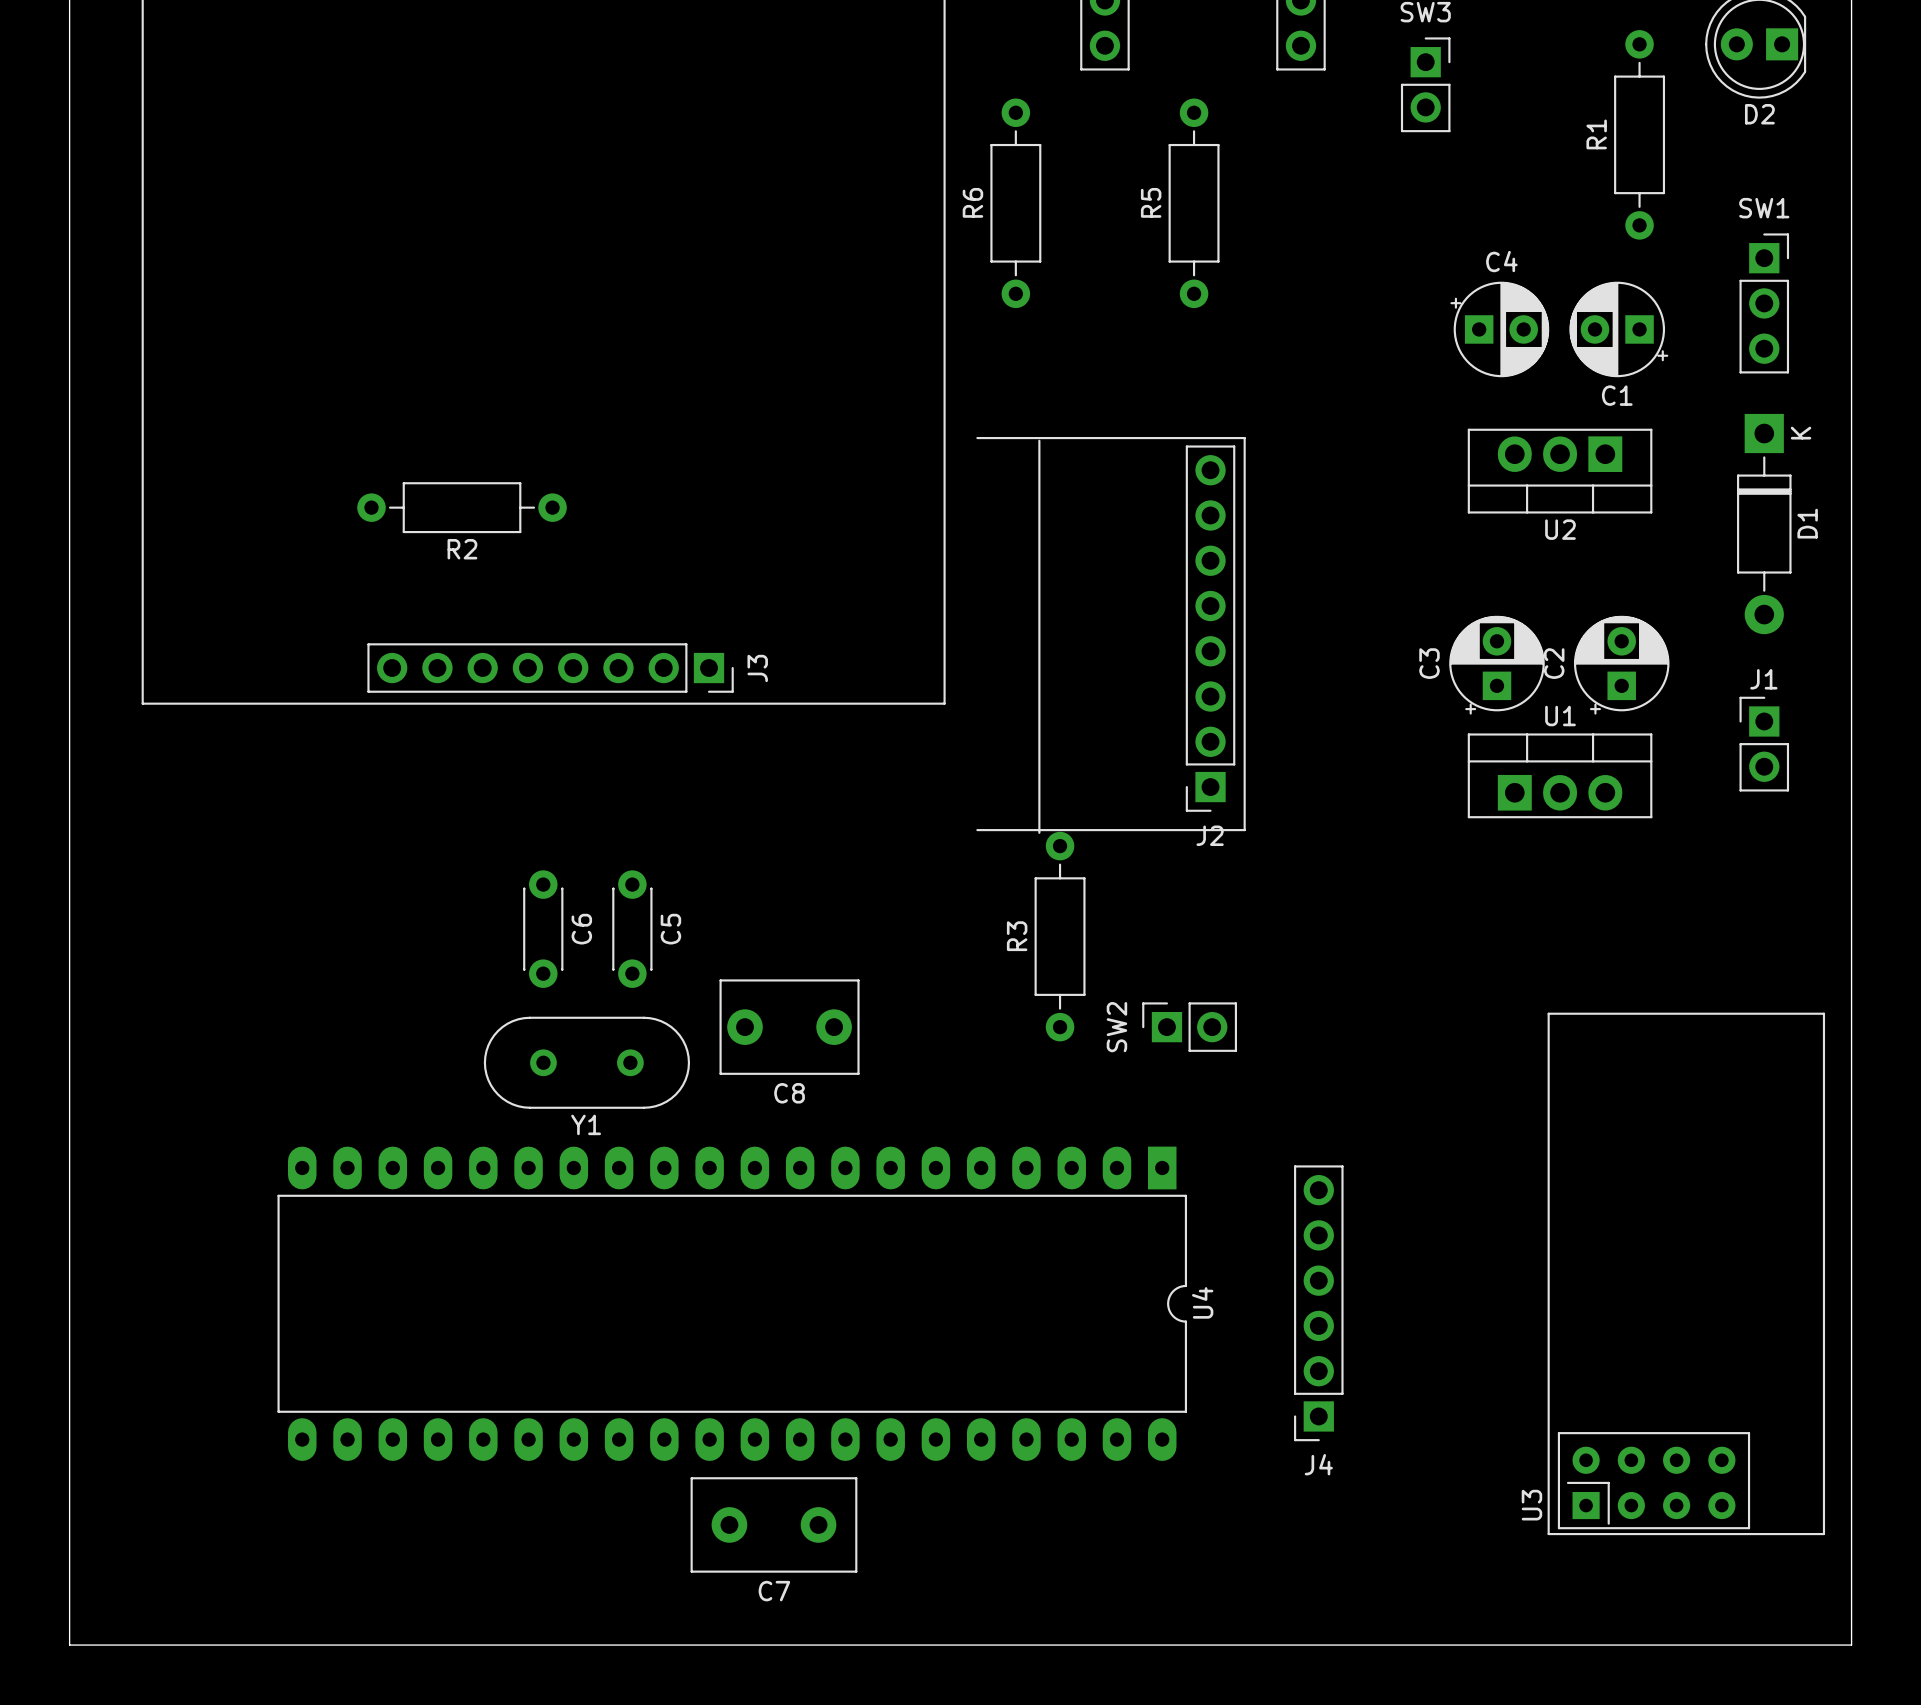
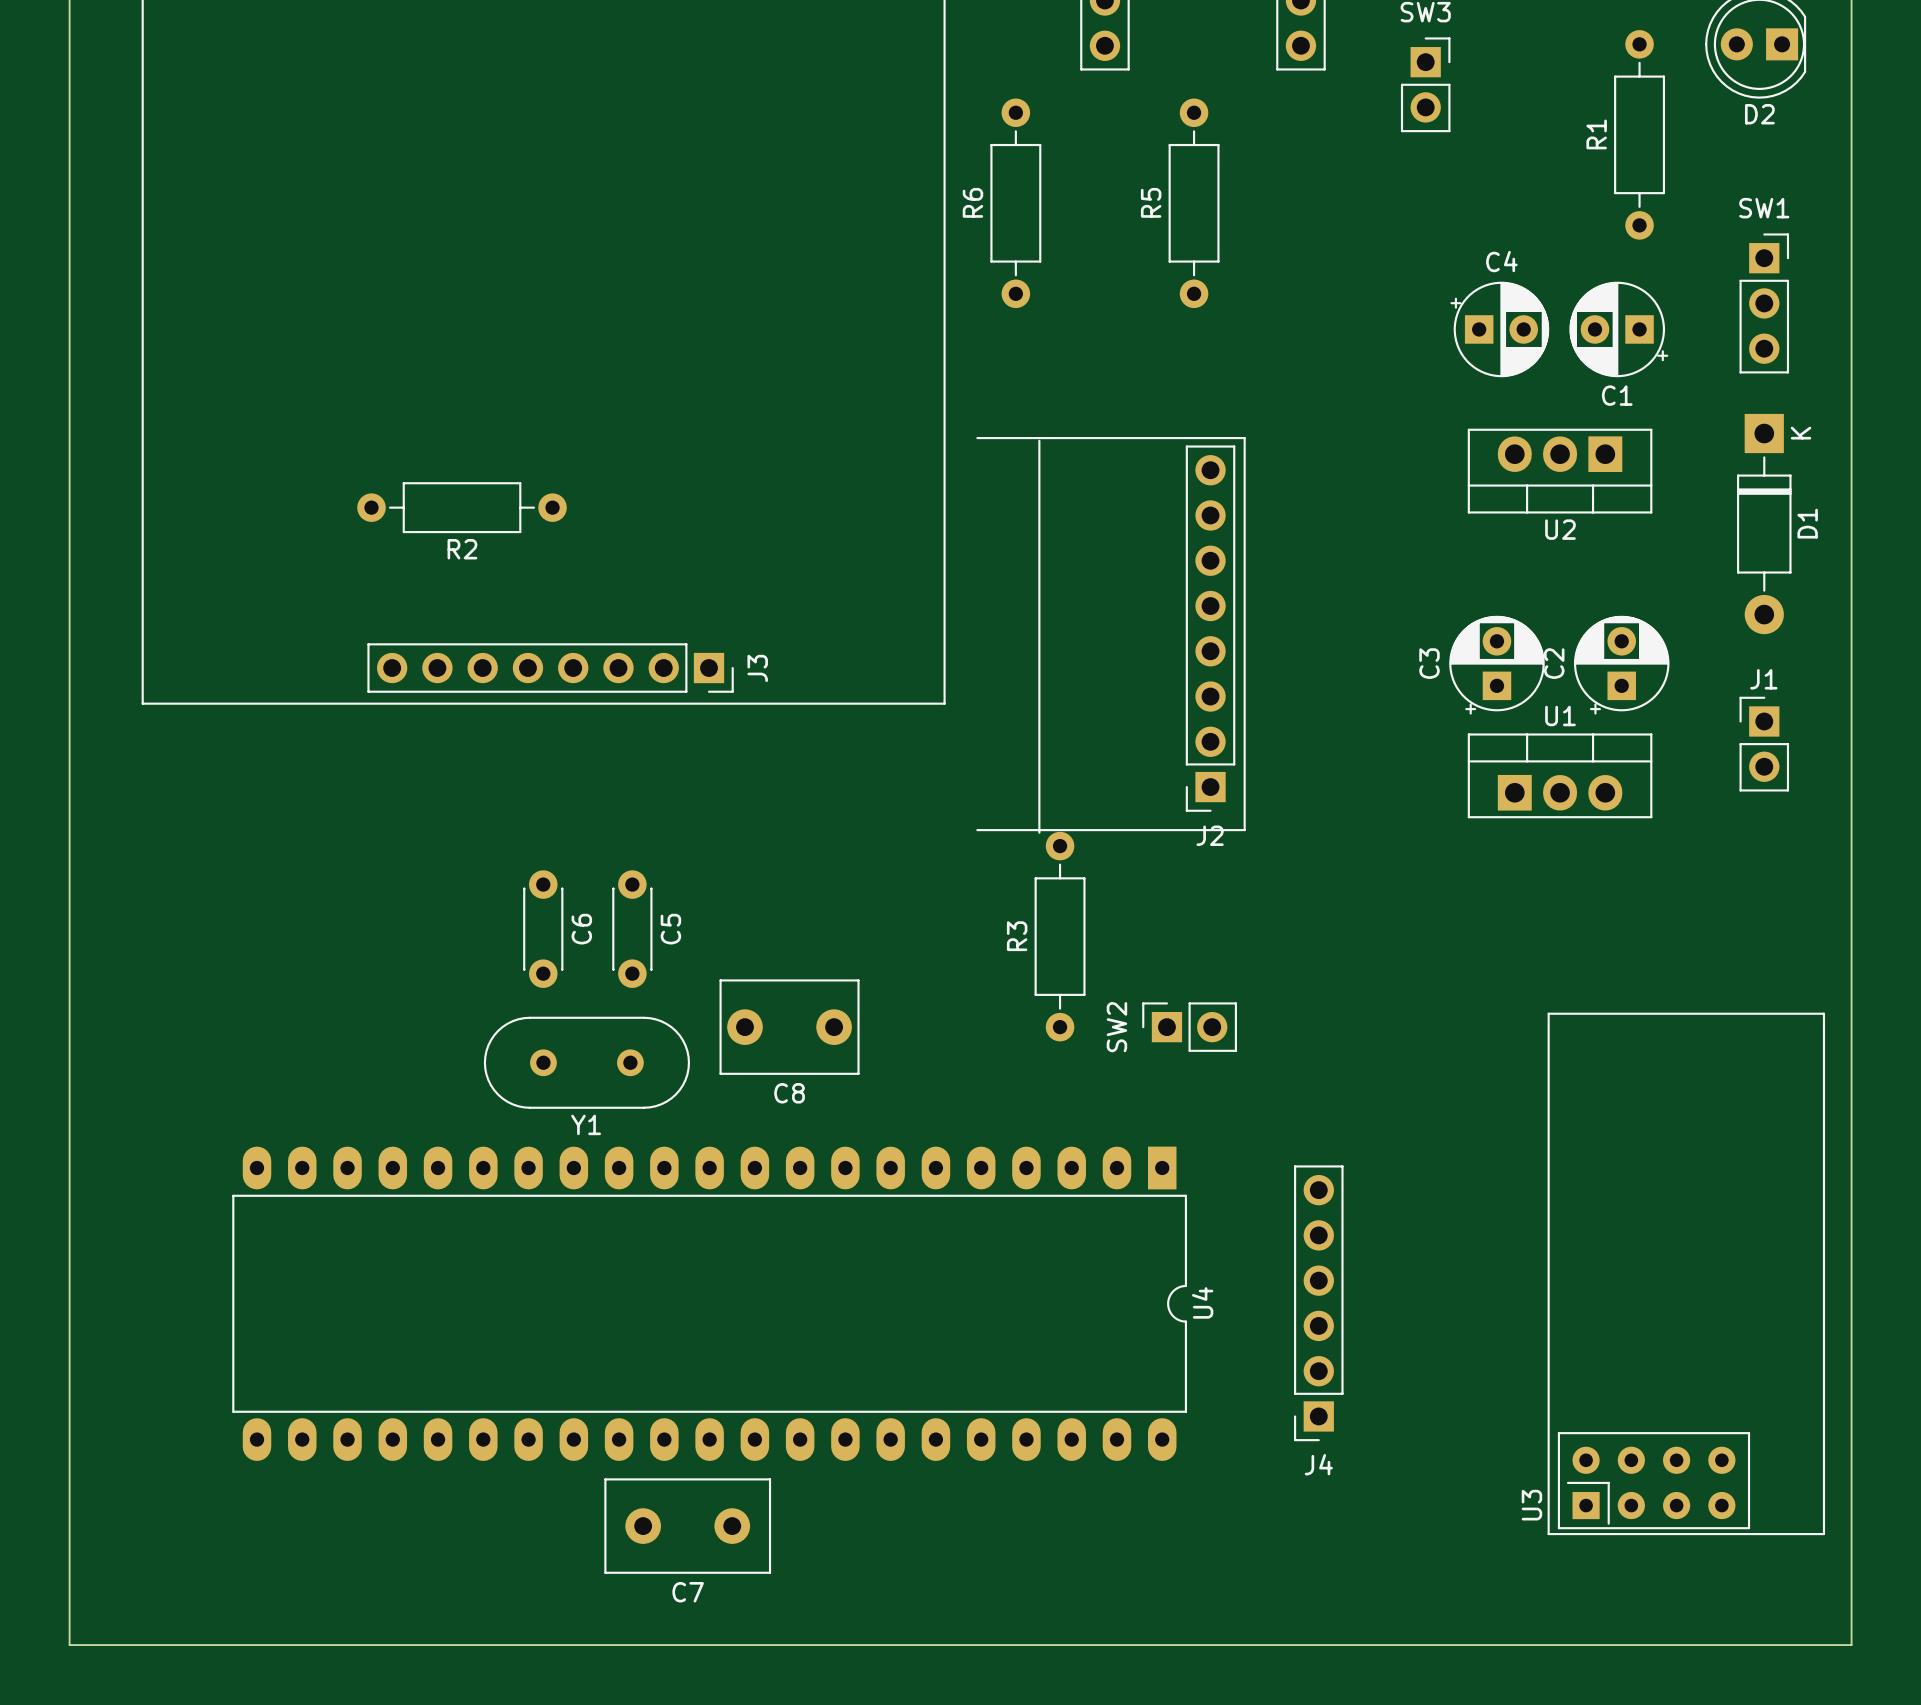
U4 footprint: [277, 1146, 1188, 1461] -> [232, 1146, 1188, 1461]
C7 position: (773, 1524) -> (687, 1526)

